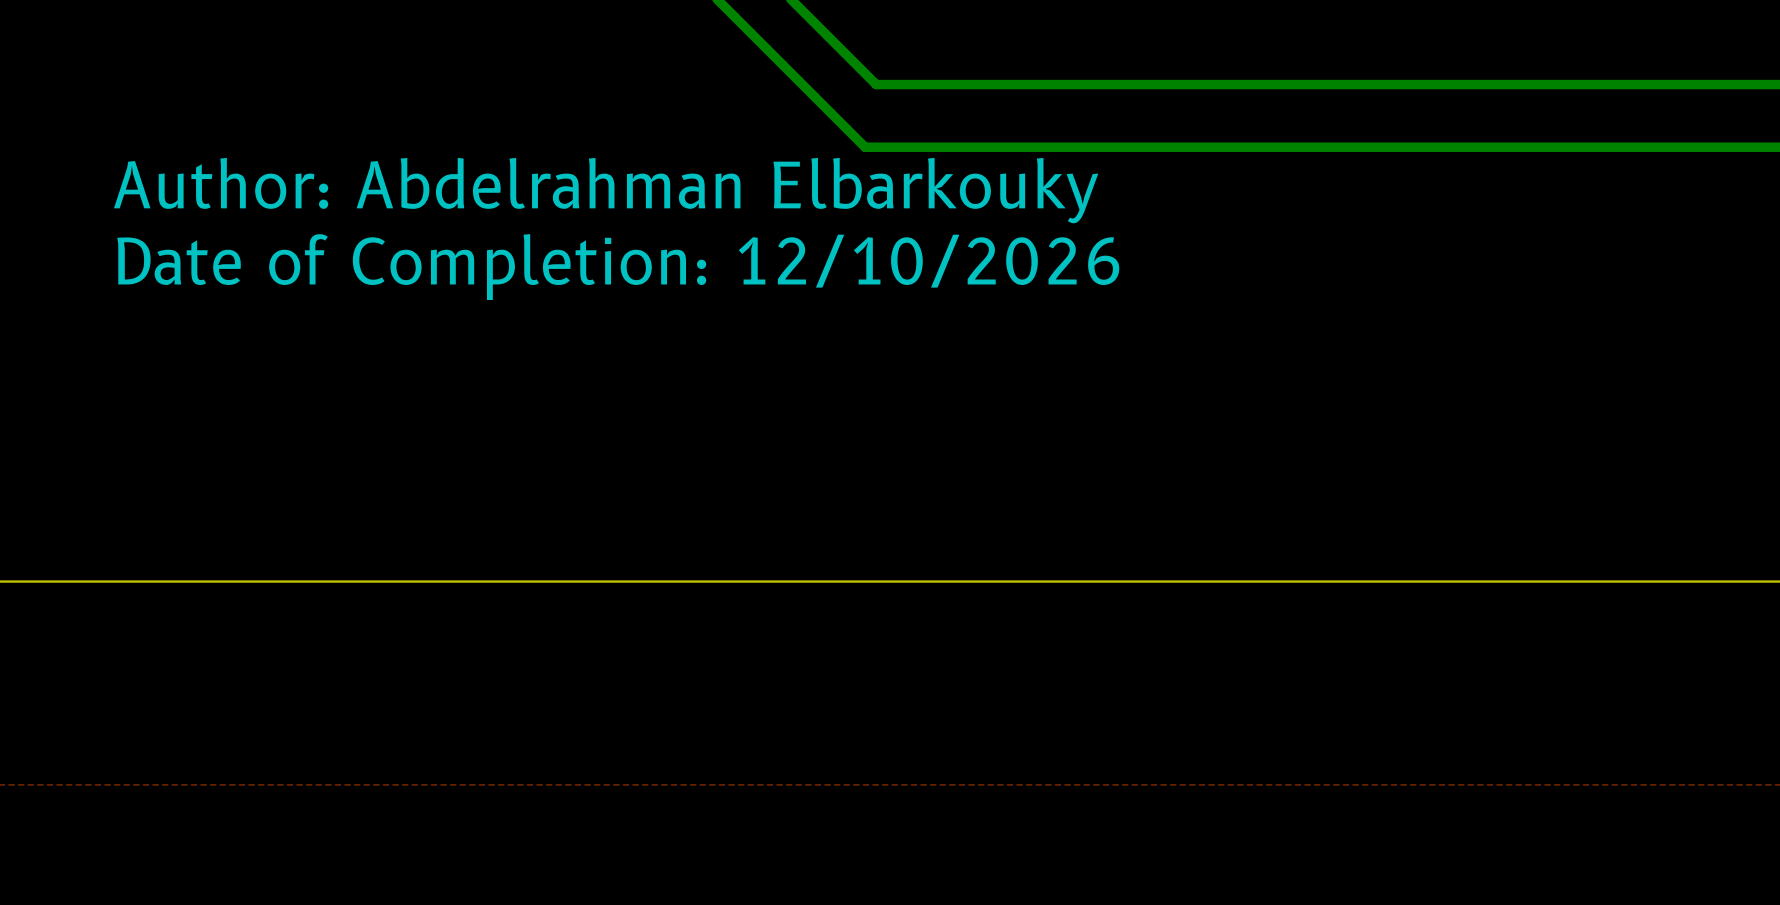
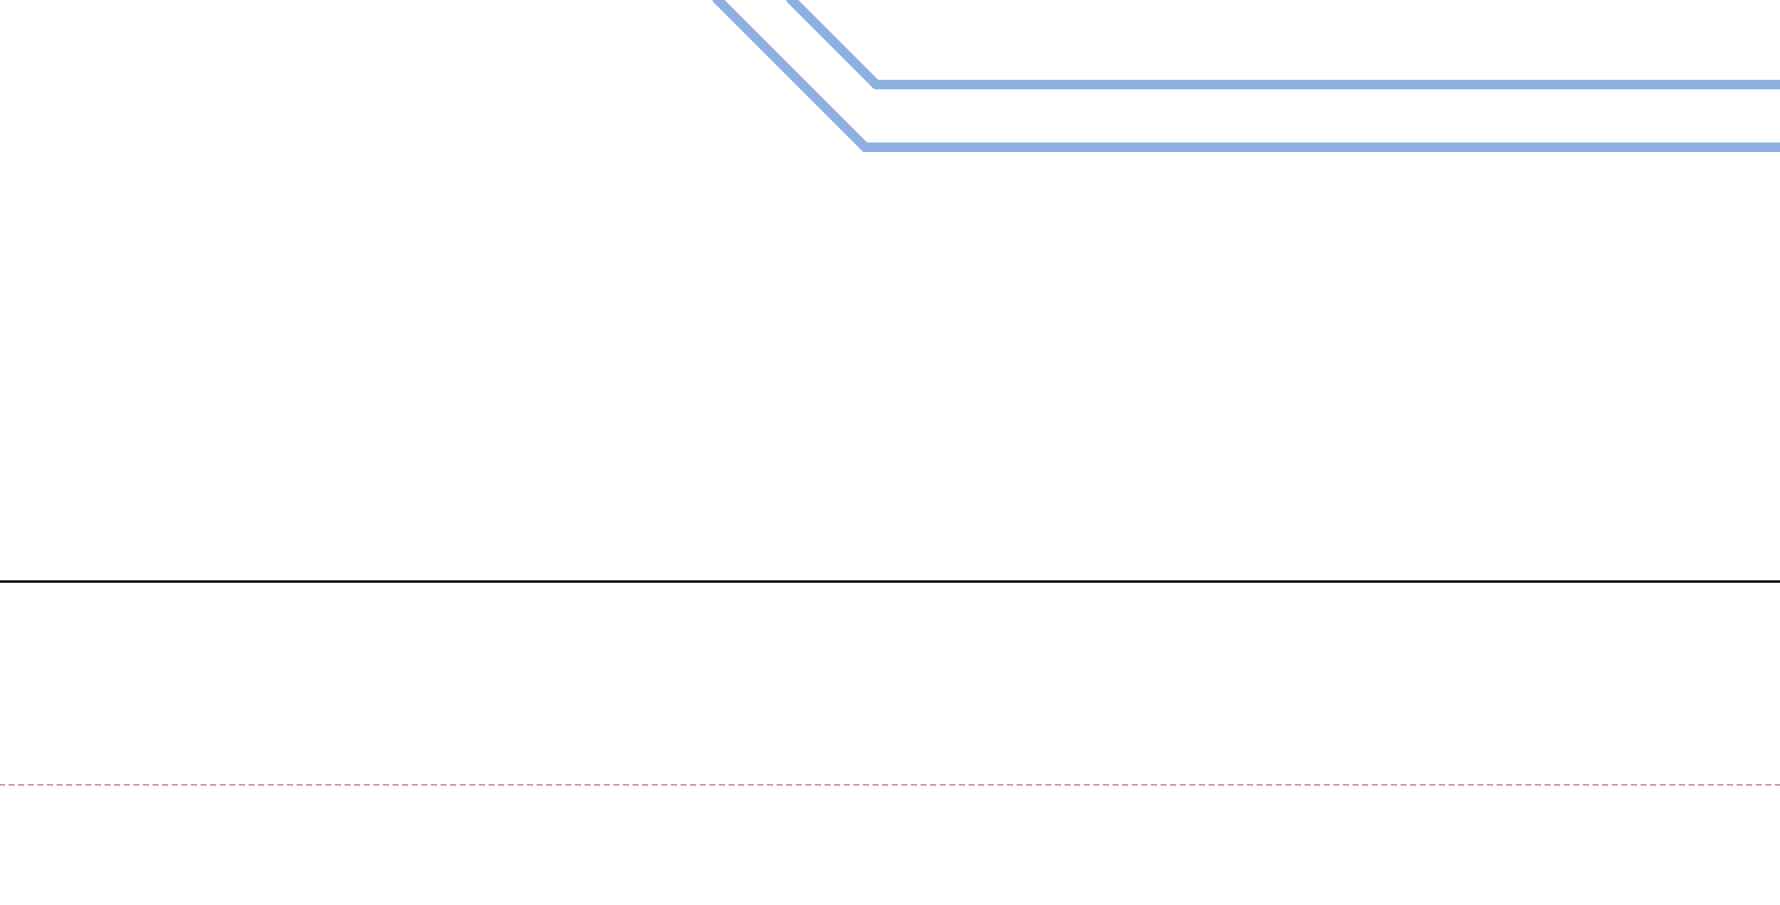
text: Author: Abdelrahman Elbarkouky (606, 190) -> none
text: Date of Completion: 12/10/2026 (618, 267) -> none

